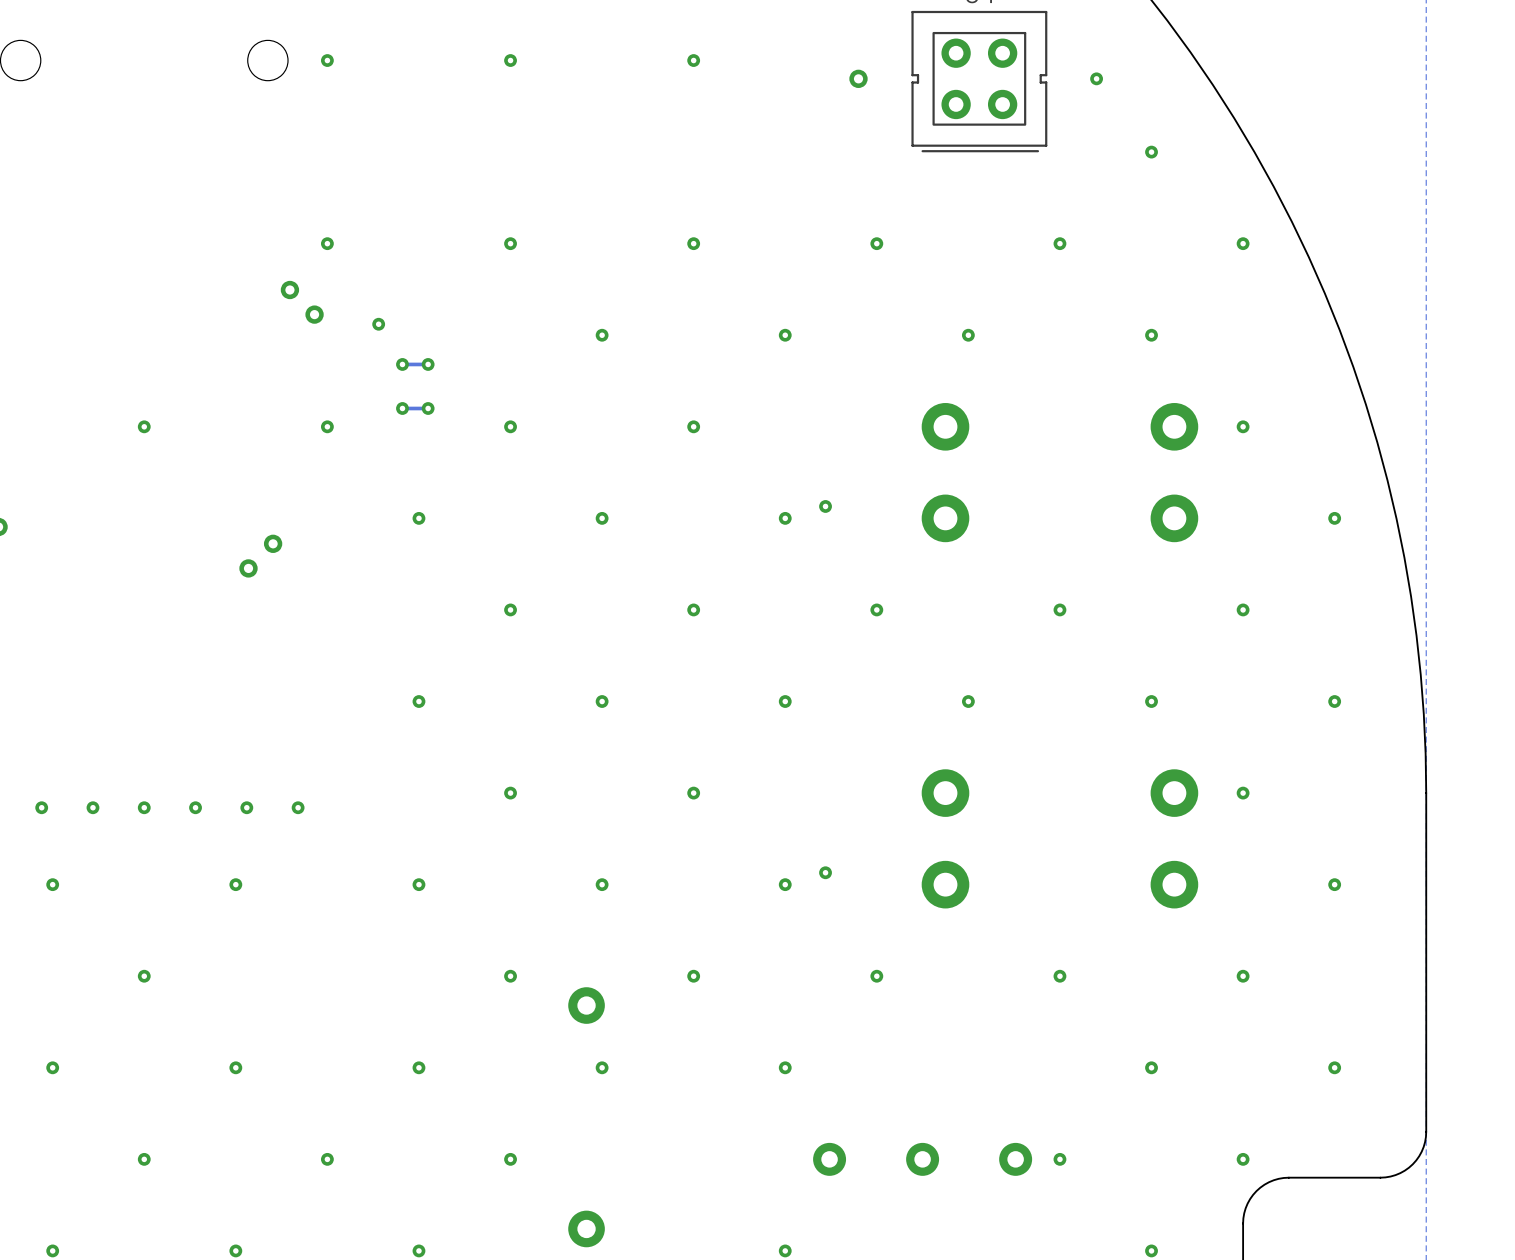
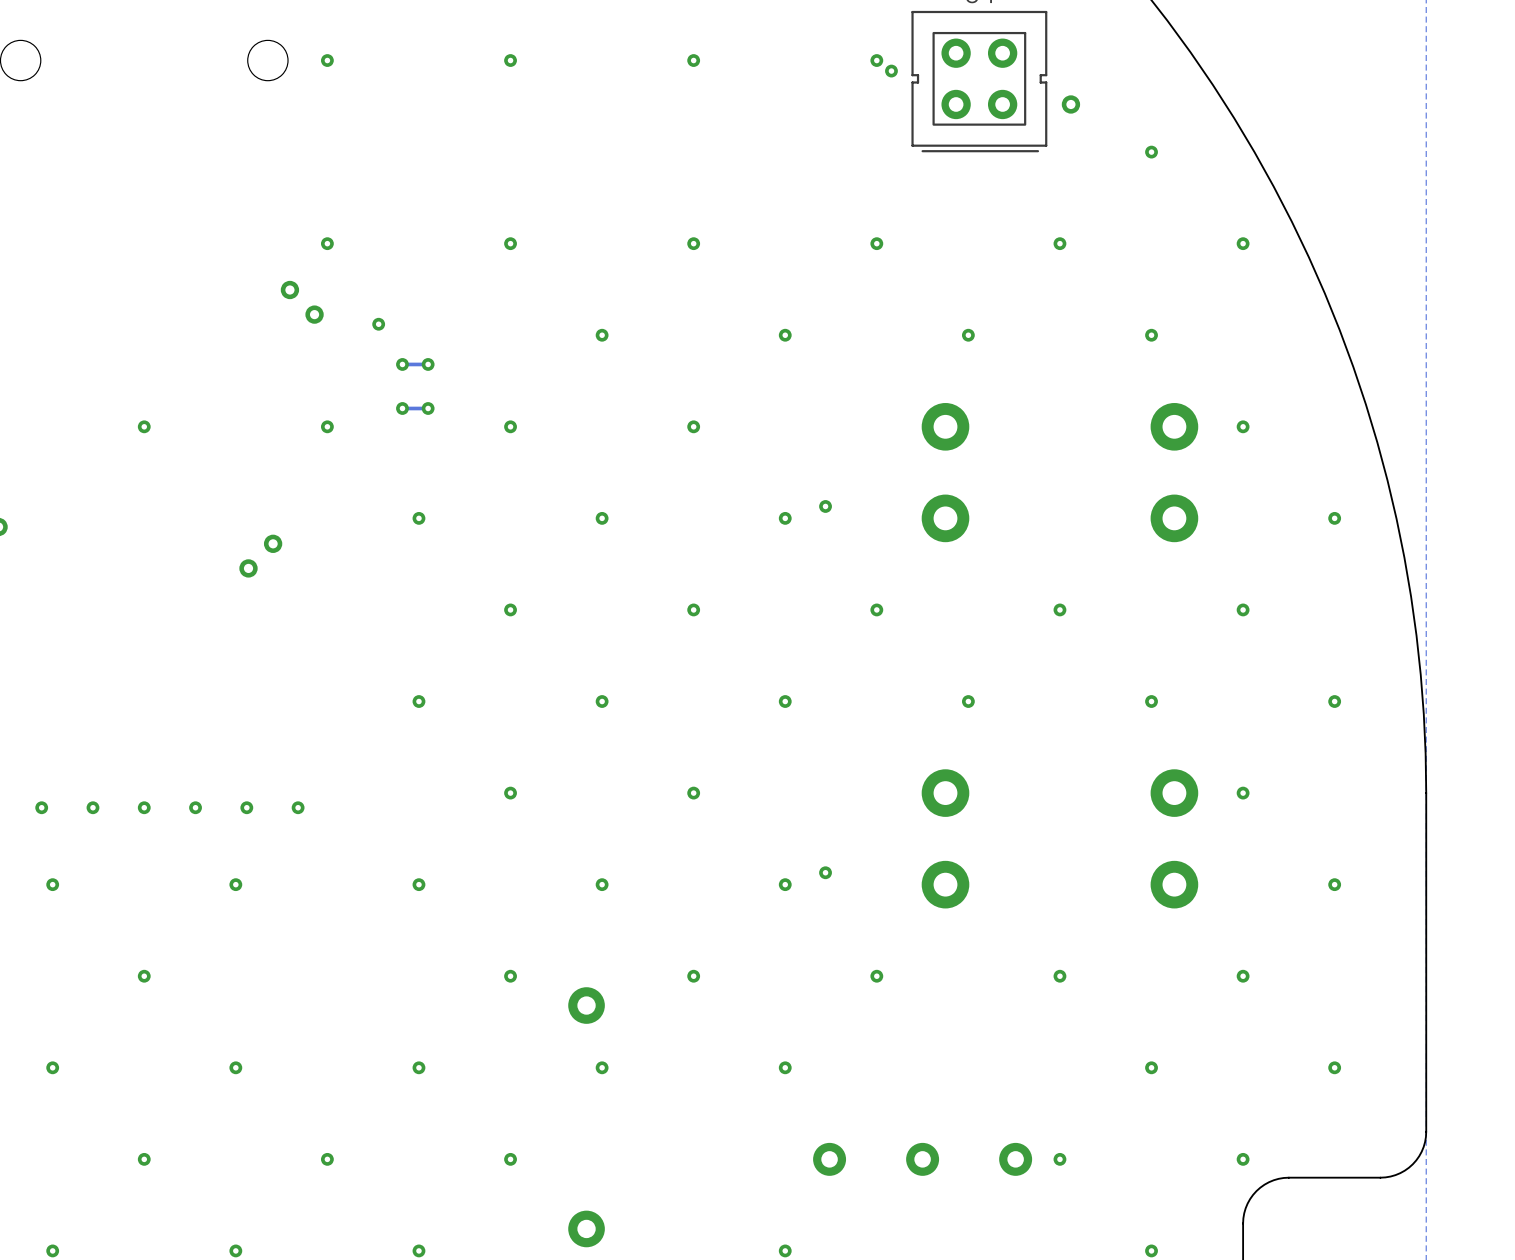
via: none -> (876, 60)
via: none -> (891, 71)
via: (858, 78) -> none
via: (1096, 78) -> none
via: none -> (1070, 104)

